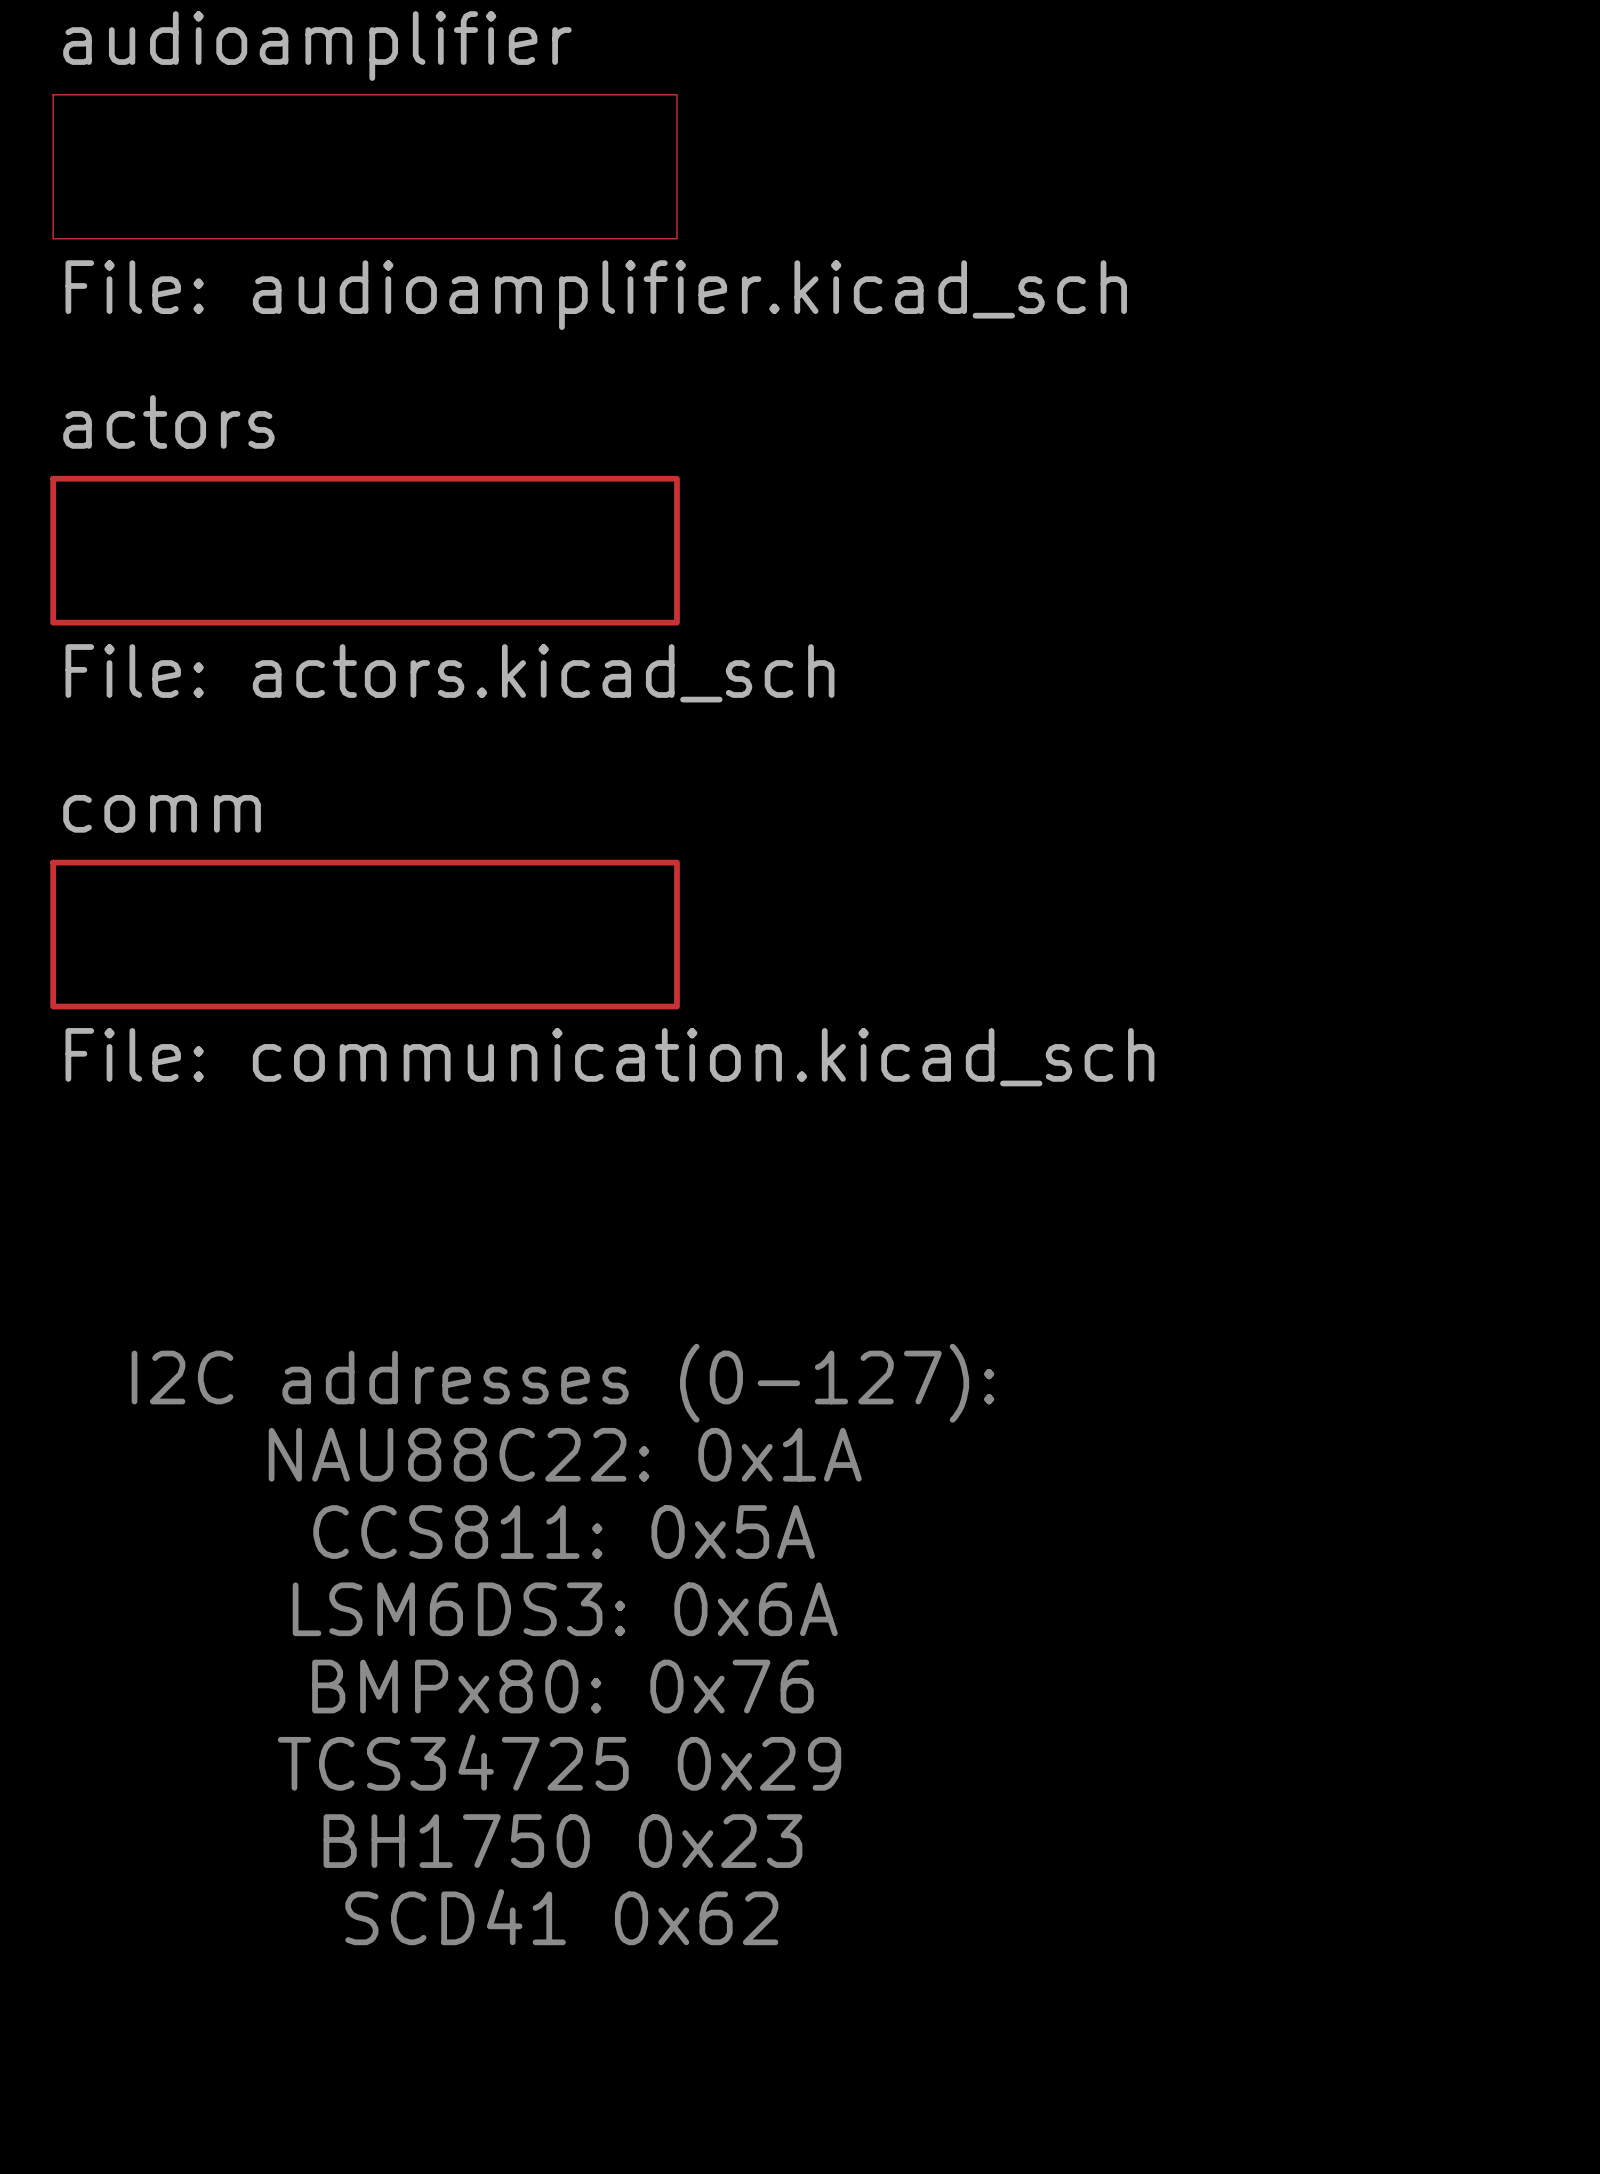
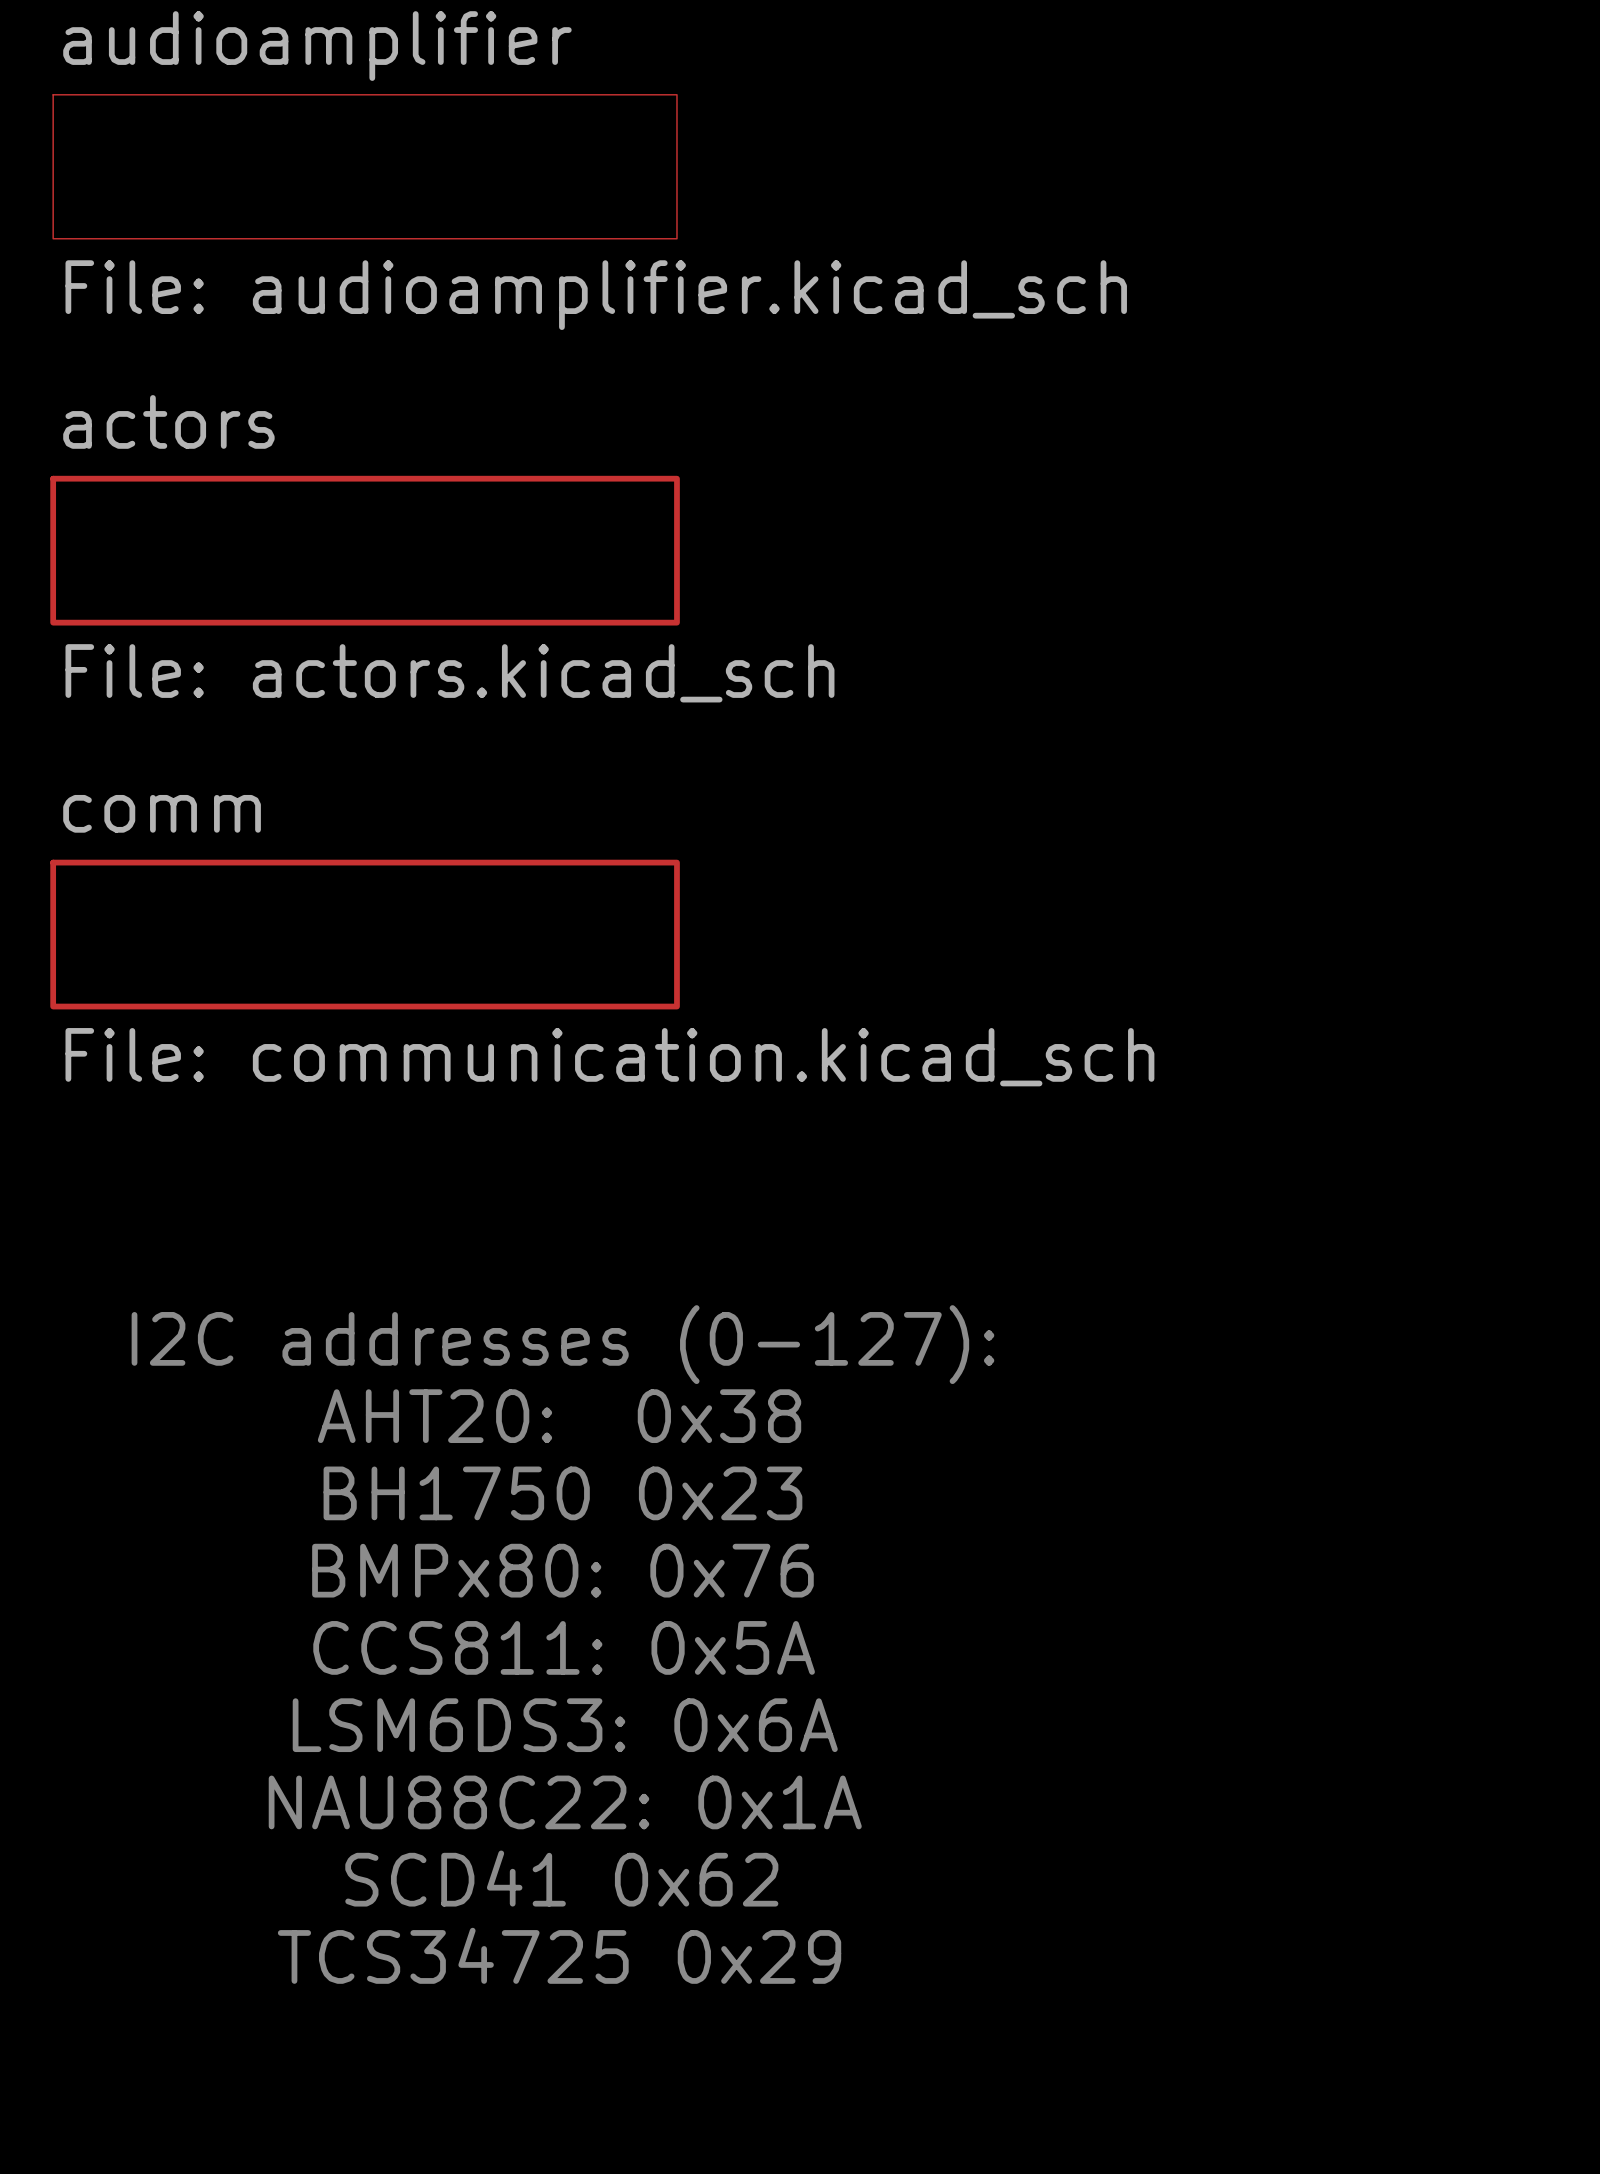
text position: I2C addresses (0-127): (562, 1383) -> I2C addresses (0-127): (562, 1344)
text: none -> AHT20: 0x38 (559, 1416)
text position: NAU88C22: 0x1A (565, 1454) -> NAU88C22: 0x1A (565, 1802)
text position: CCS811: 0x5A (564, 1532) -> CCS811: 0x5A (564, 1647)
text position: LSM6DS3: 0x6A (565, 1609) -> LSM6DS3: 0x6A (565, 1725)
text position: BMPx80: 0x76 (562, 1686) -> BMPx80: 0x76 (562, 1570)
text position: TCS34725 0x29 (559, 1762) -> TCS34725 0x29 (559, 1955)
text position: BH1750 0x23 (562, 1841) -> BH1750 0x23 (562, 1493)
text position: SCD41 0x62 (561, 1917) -> SCD41 0x62 (561, 1878)

